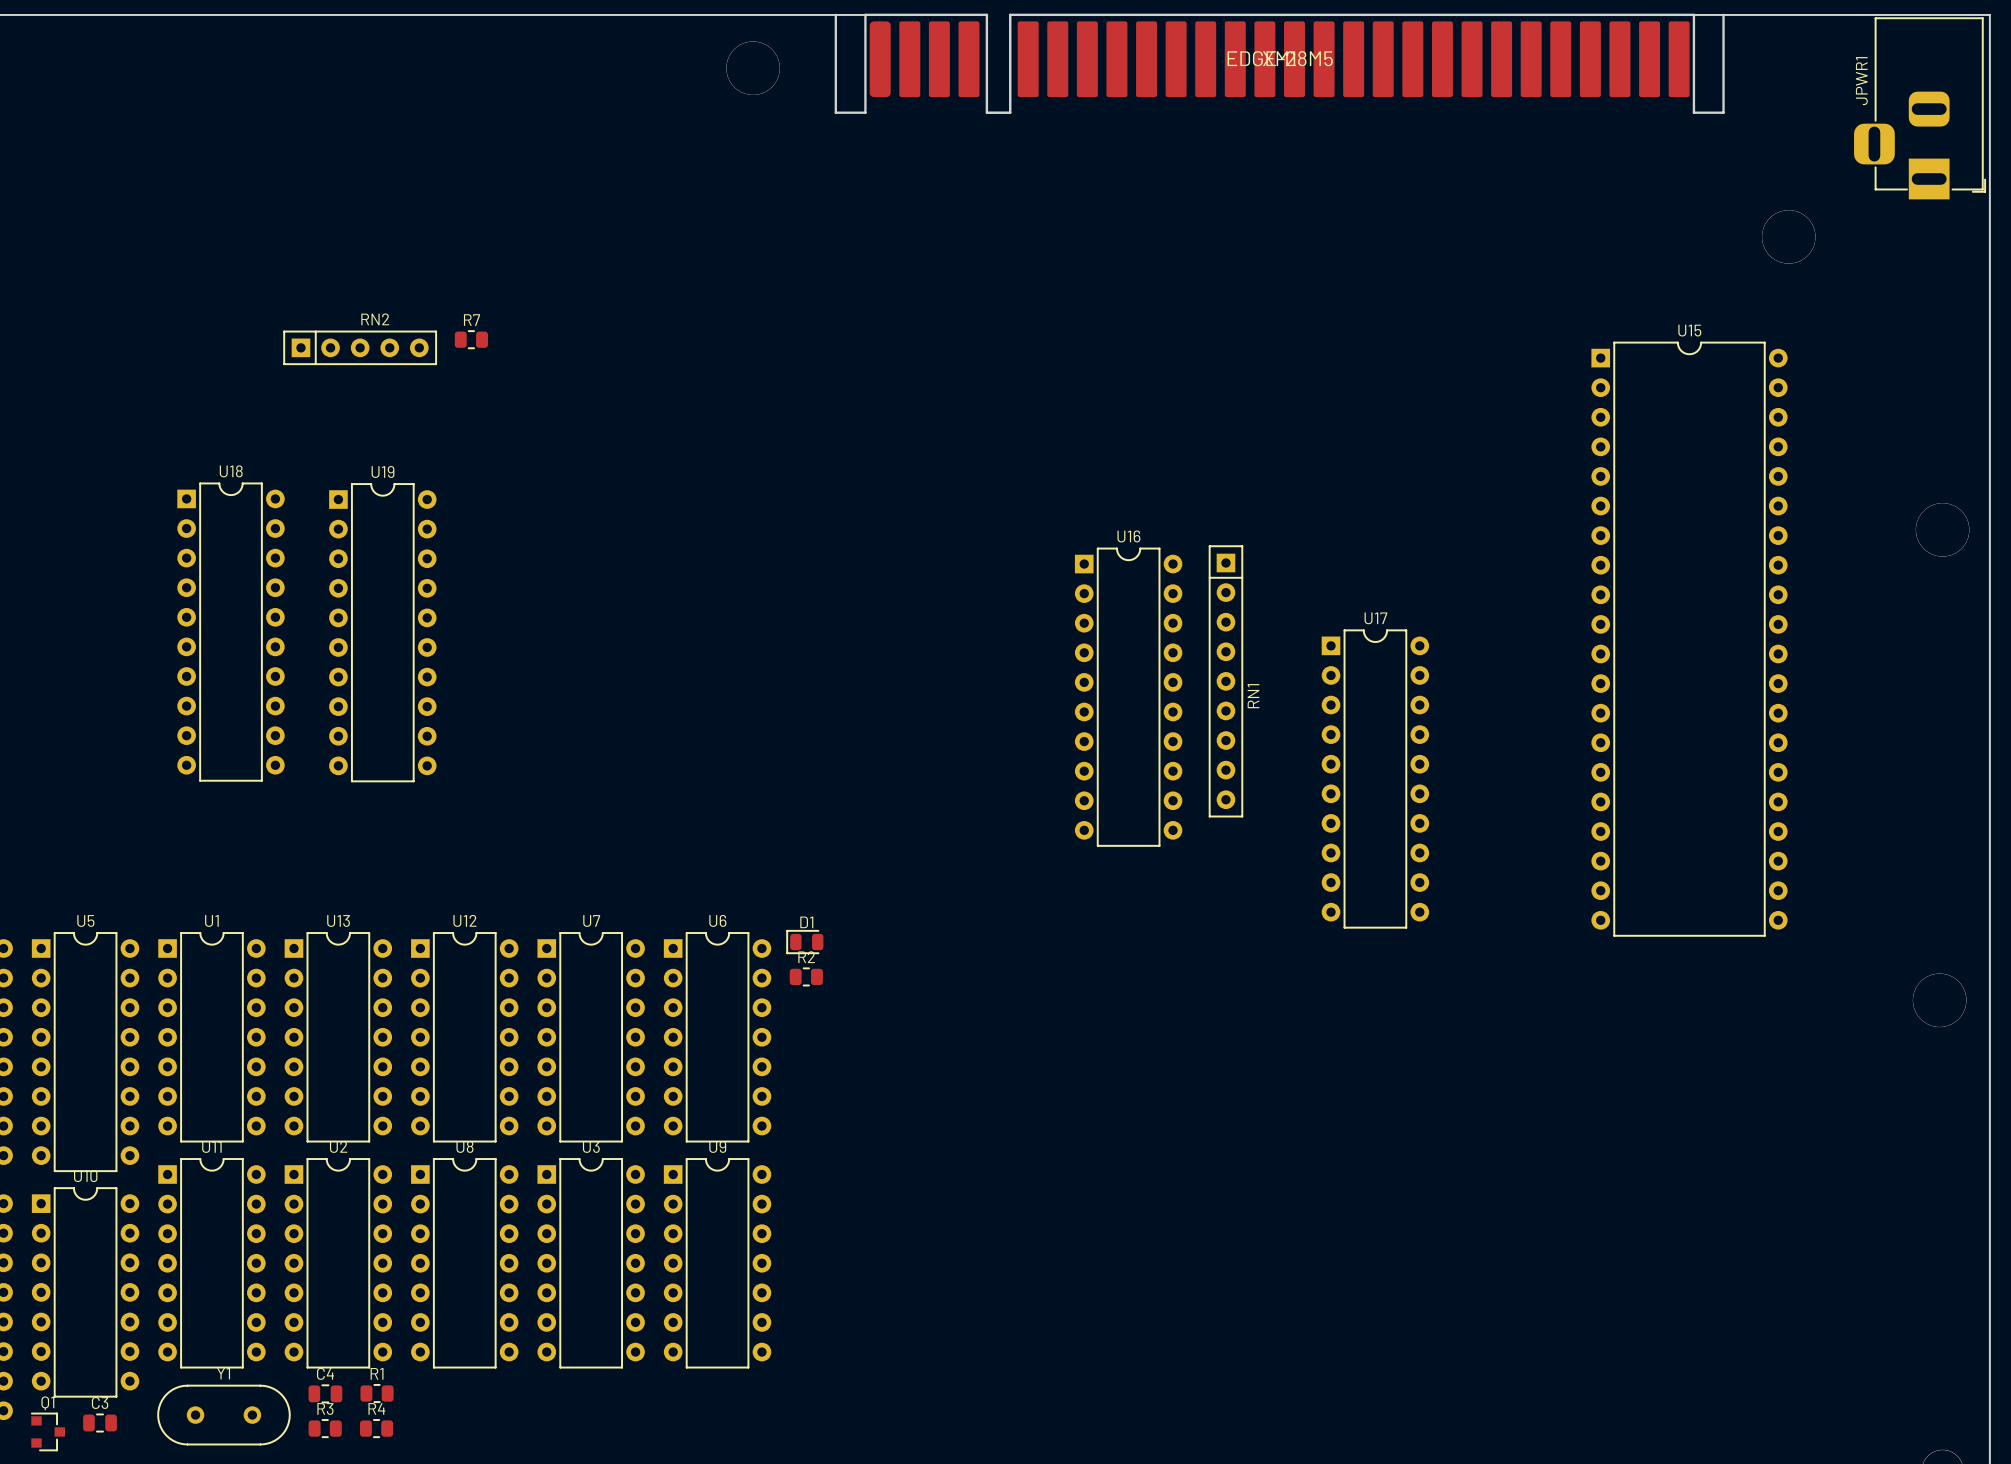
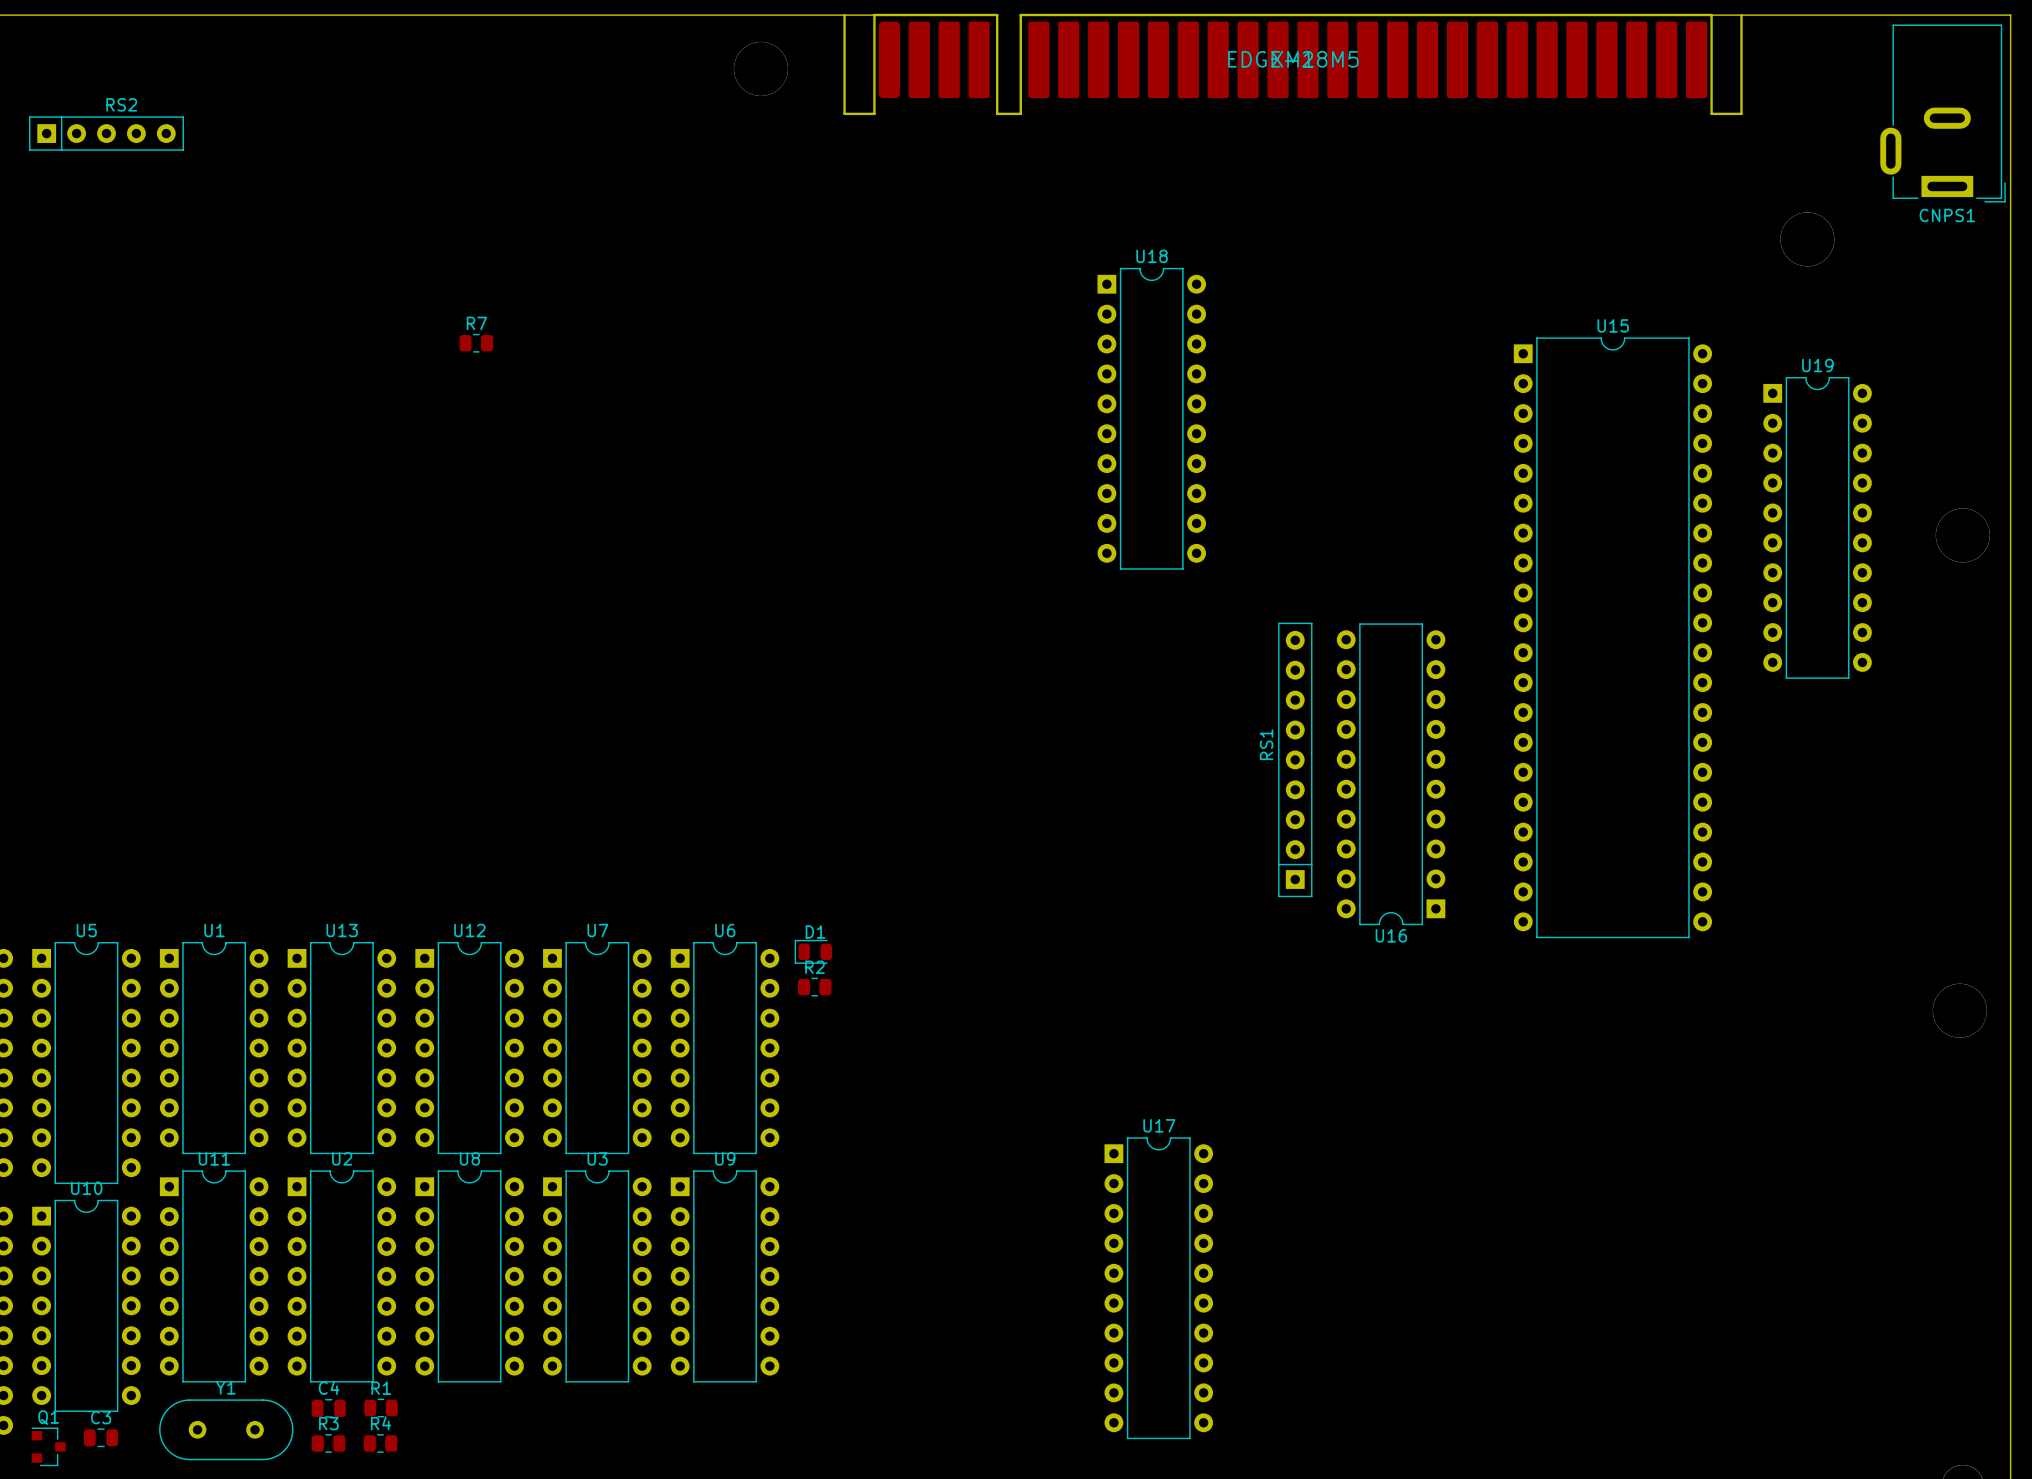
JPWR1: (1919, 108) -> none
CNPS1: none -> (1942, 113)
RS2: none -> (106, 133)
RN2: (360, 347) -> none
U18 position: (231, 632) -> (1151, 418)
U19 position: (382, 632) -> (1817, 527)
U15 position: (1689, 639) -> (1612, 637)
RN1: (1225, 681) -> none
U16 rotation: 0° (1128, 697) -> 180° (1391, 774)
U16 position: (1128, 697) -> (1391, 774)
RS1: none -> (1295, 759)
U17 position: (1375, 779) -> (1158, 1288)

